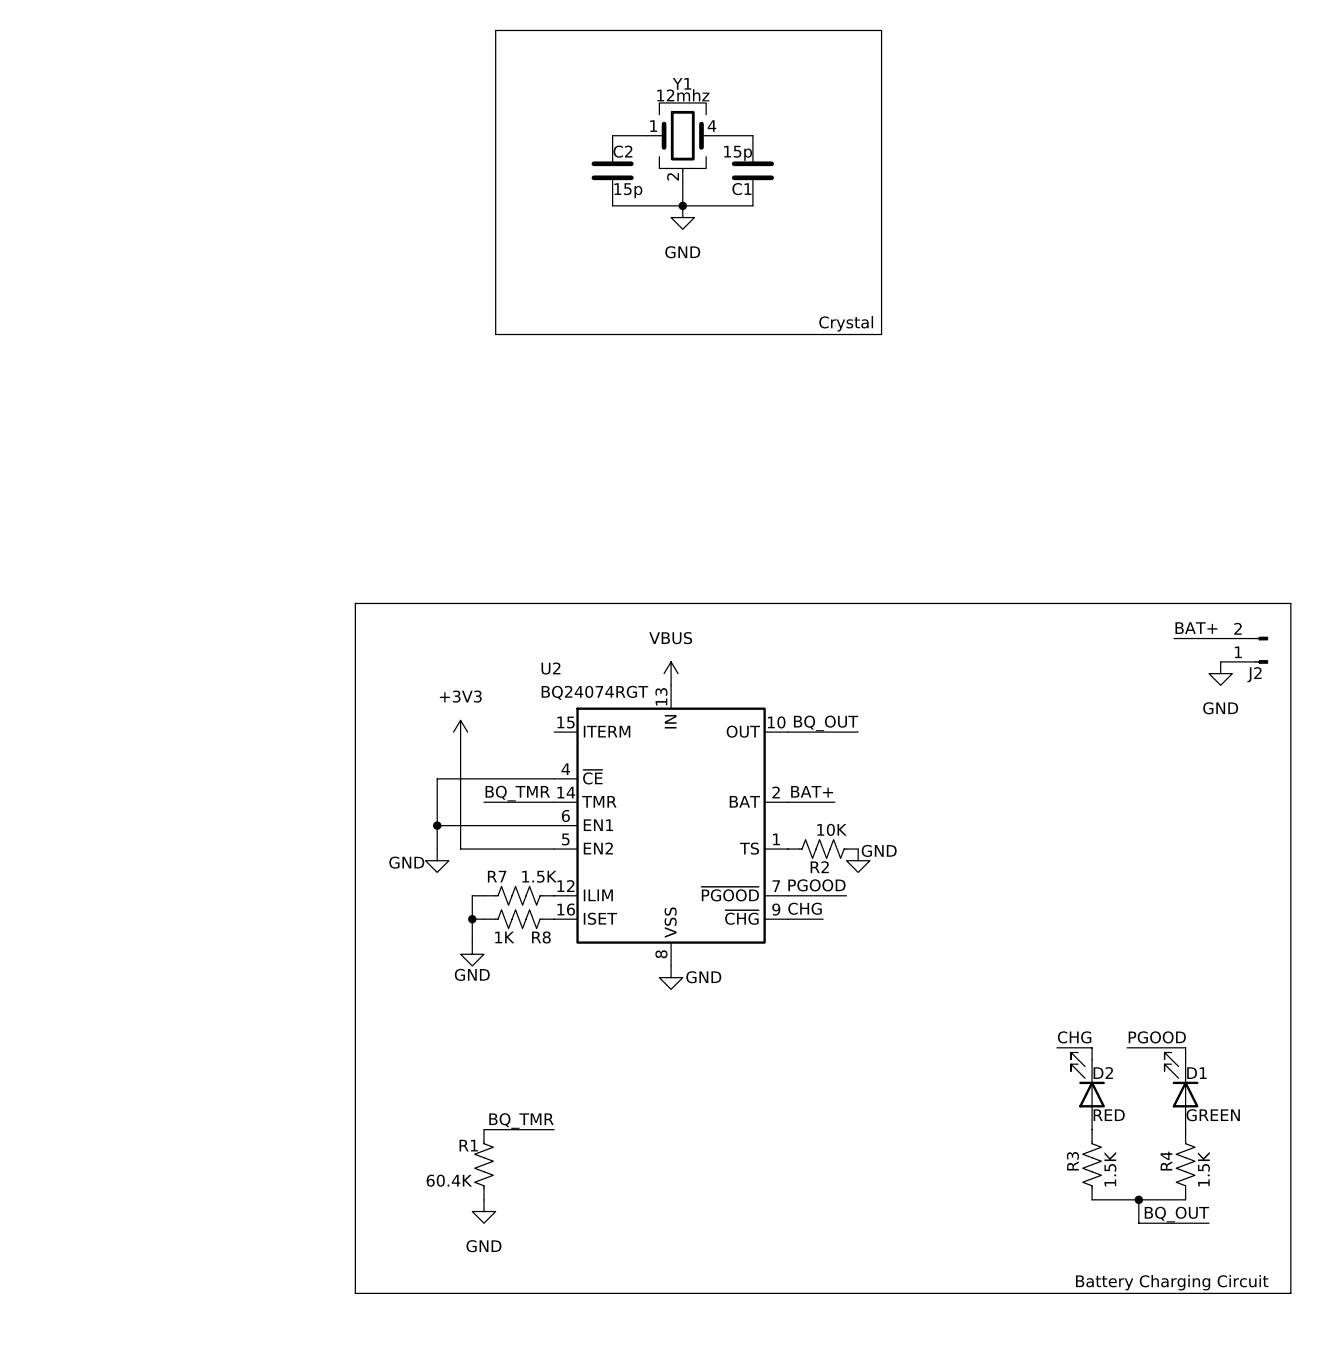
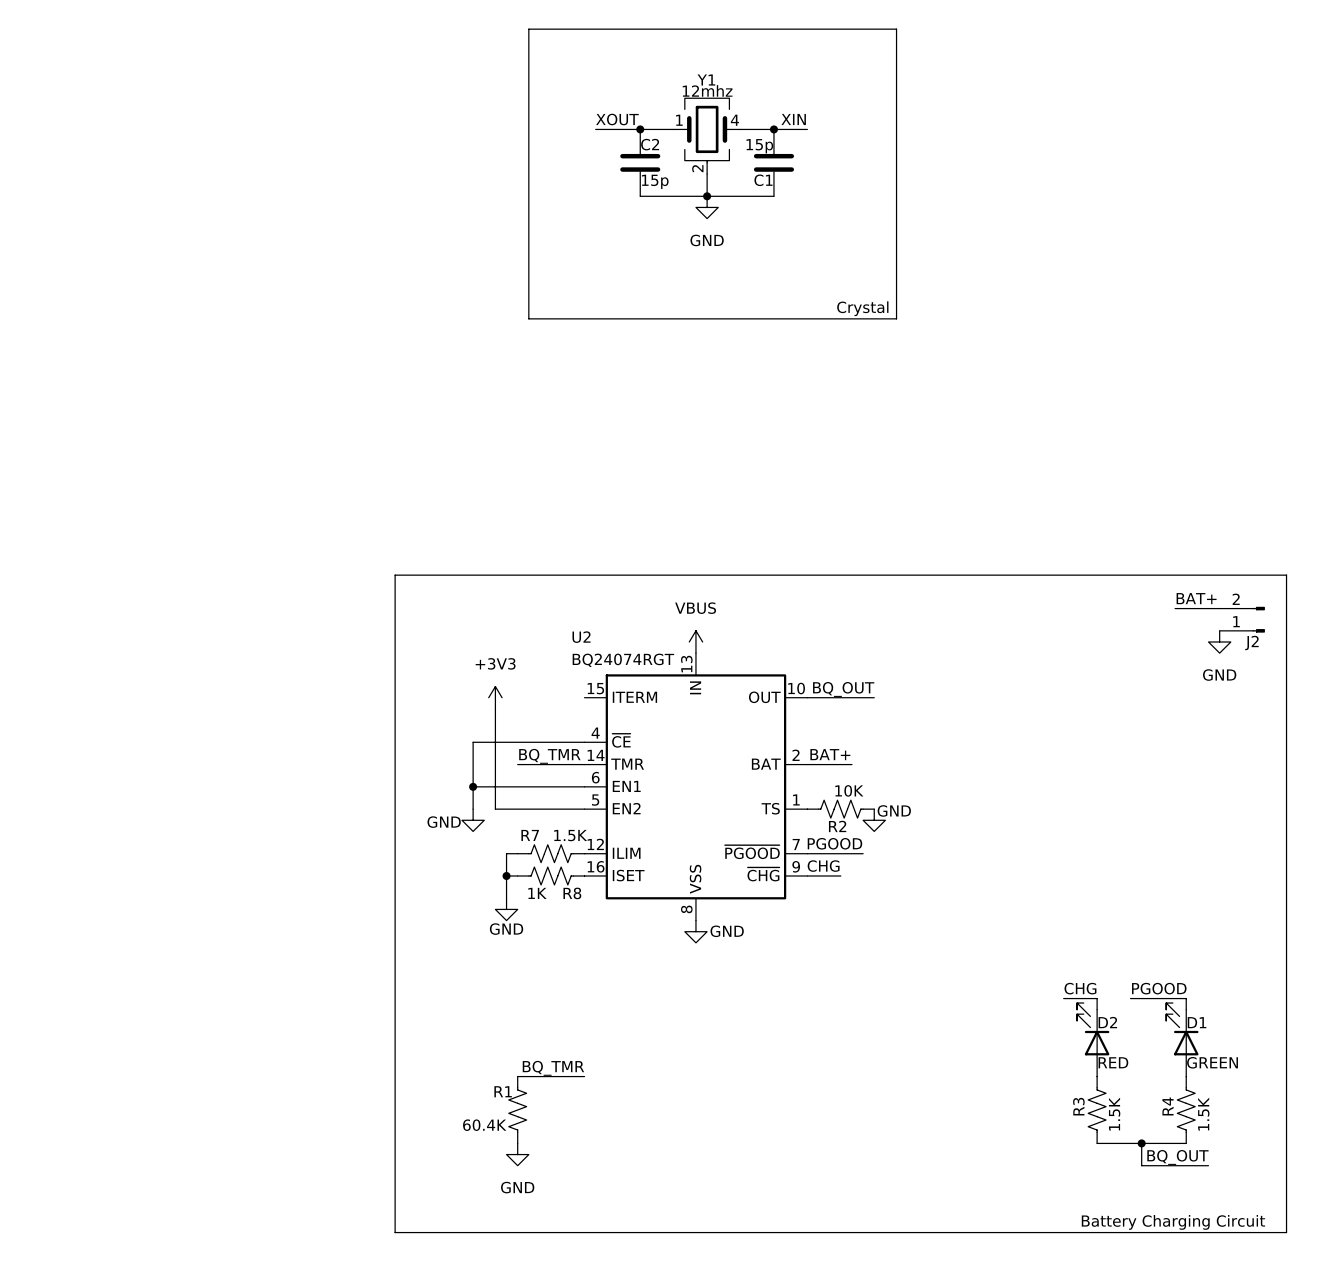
label: none -> XOUT (617, 119)
label: none -> XIN (793, 119)
wire: none -> (595, 129) (640, 129)
junction: none -> (640, 129)
wire: none -> (773, 129) (807, 129)
junction: none -> (773, 129)

